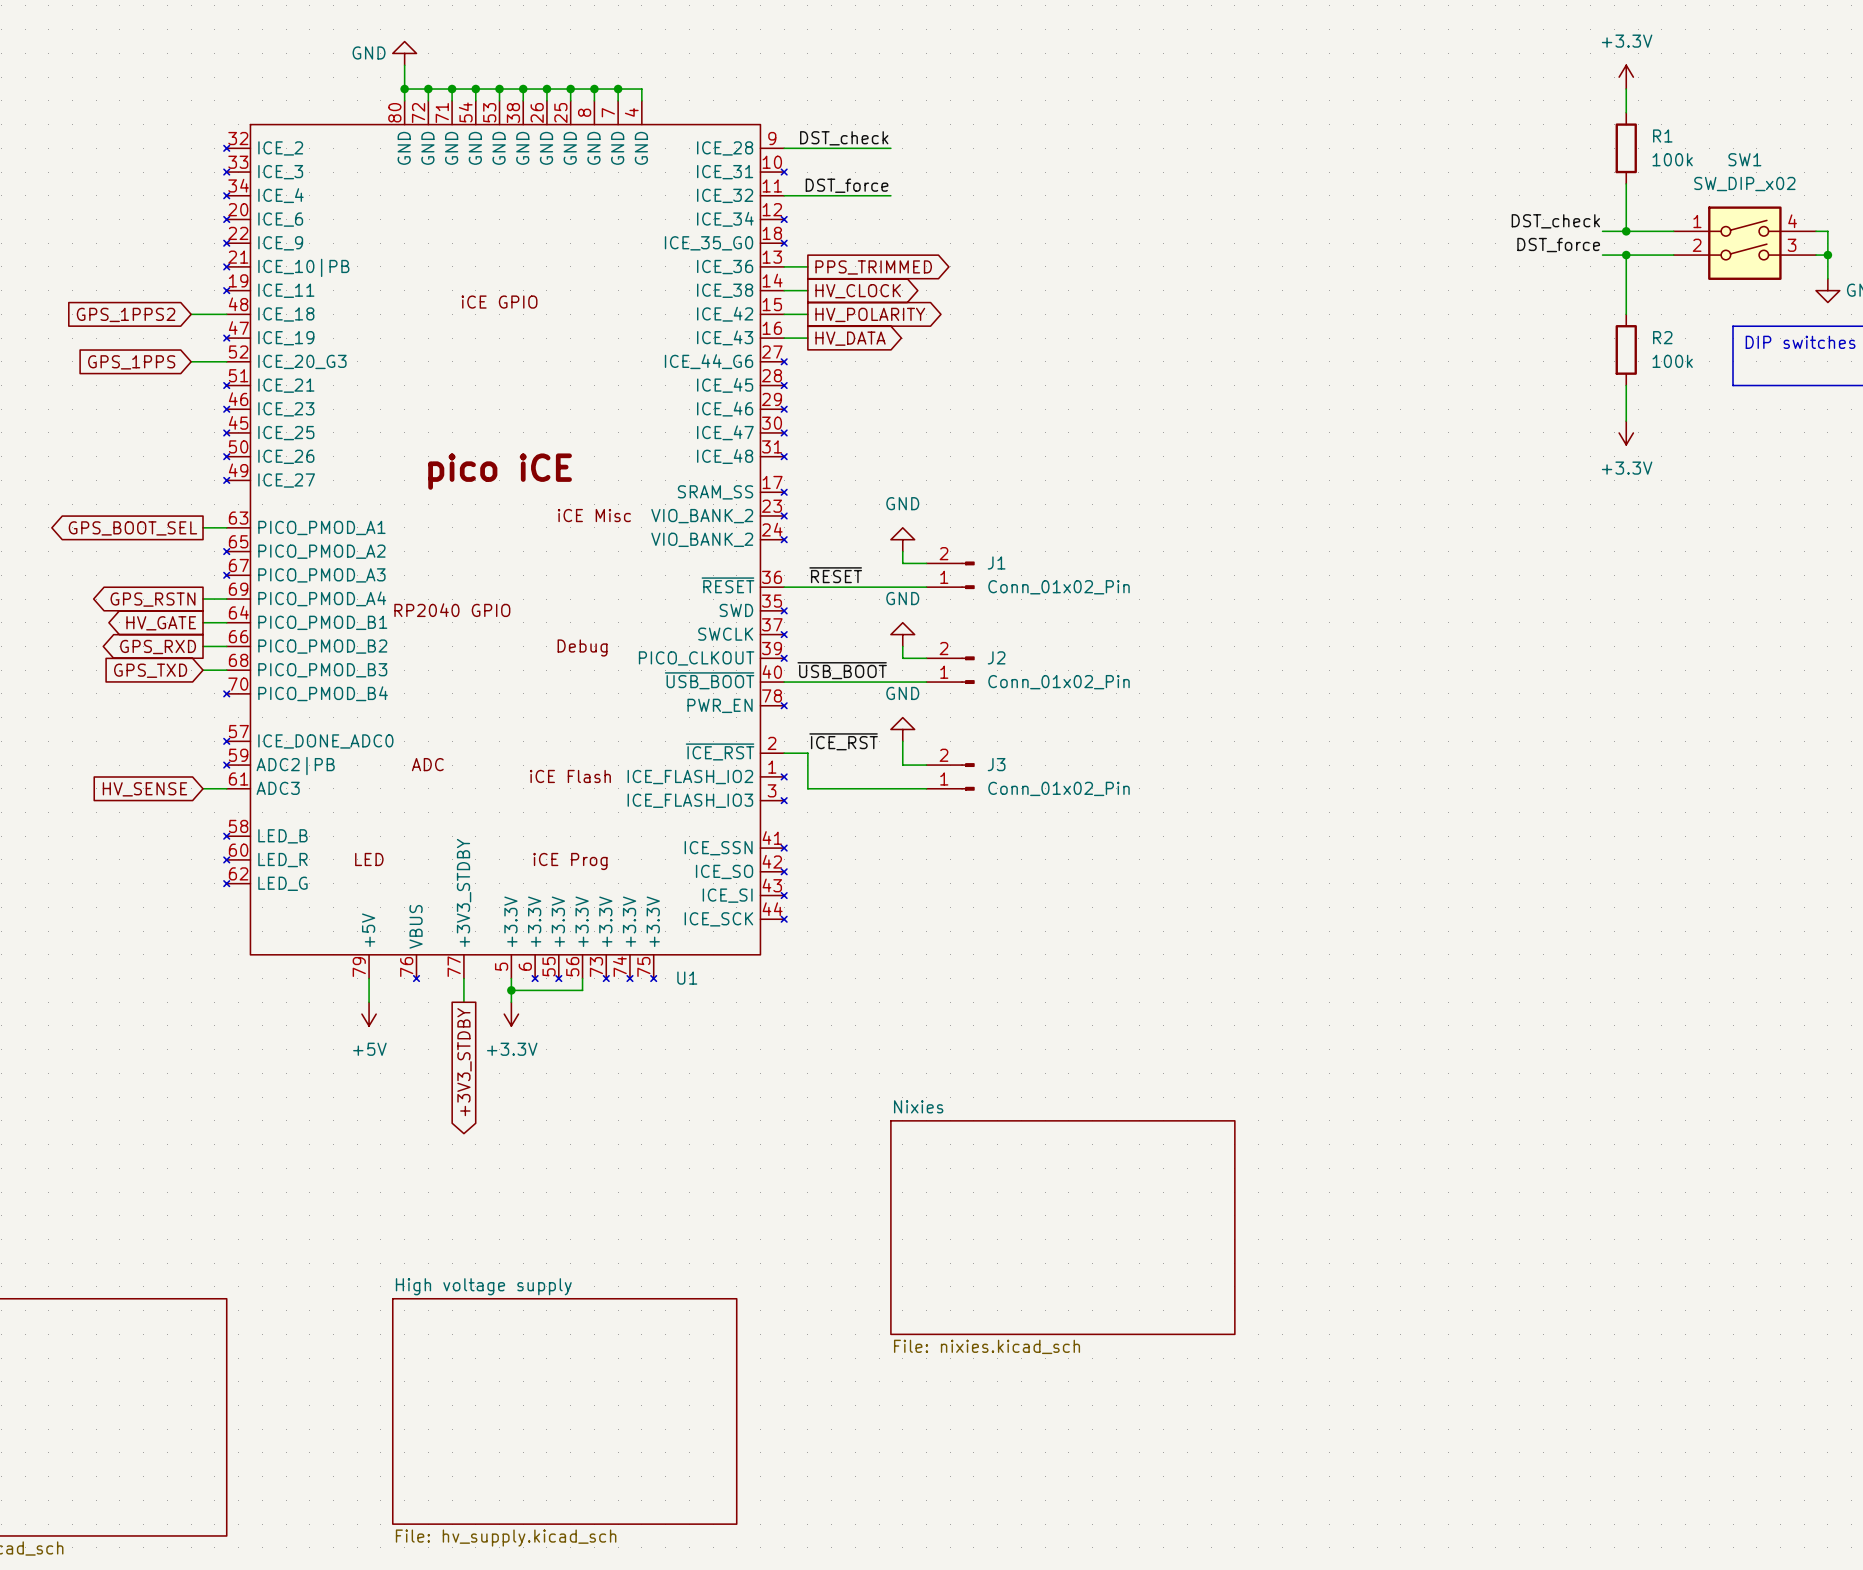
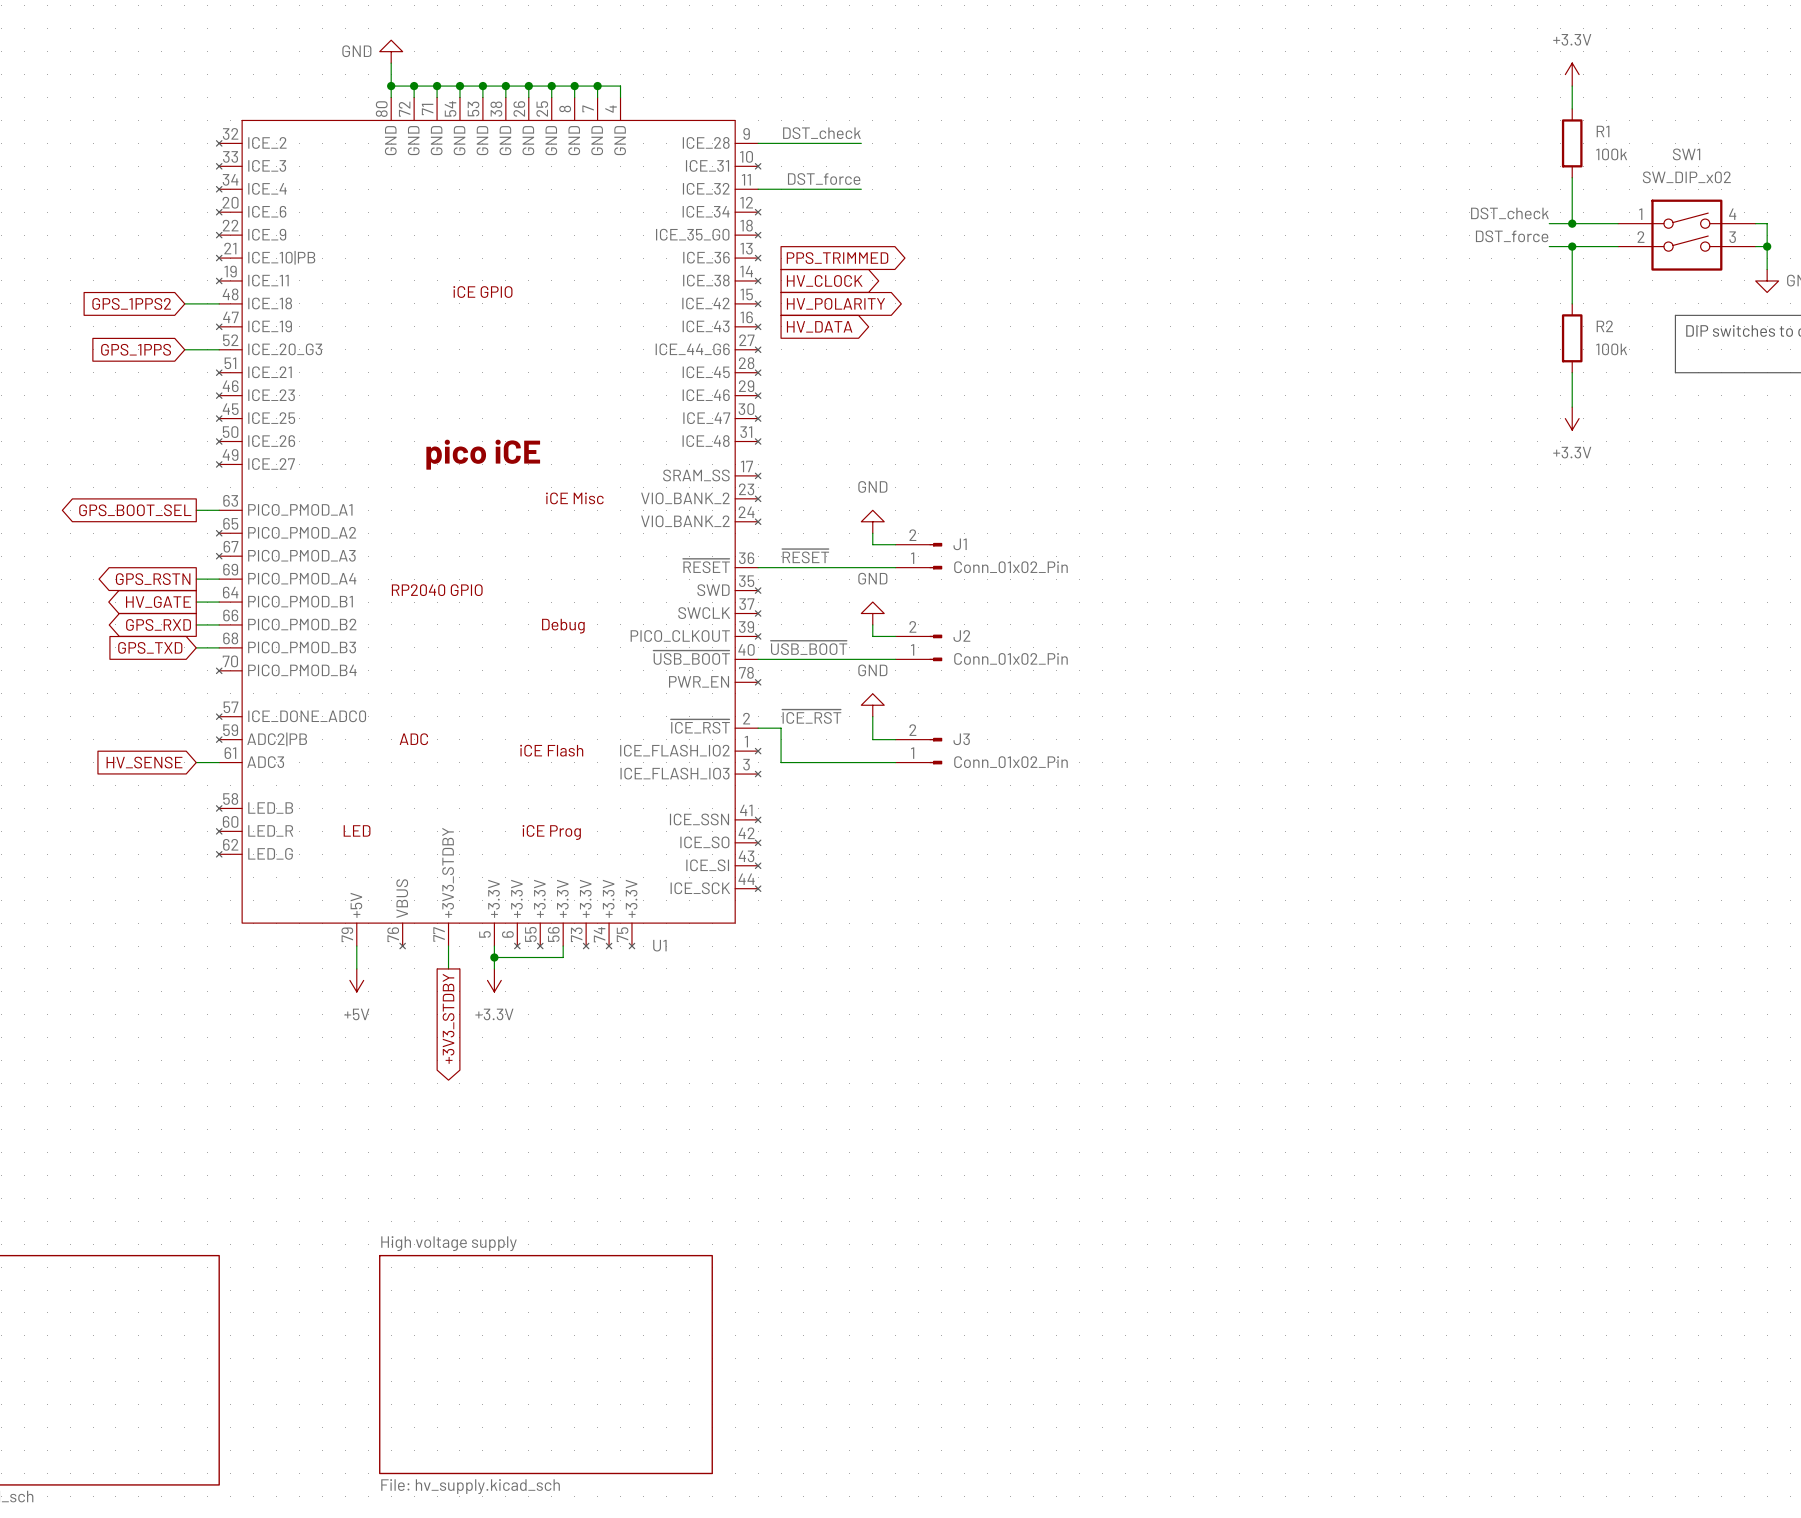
U1 symbol: [223, 100, 787, 982] -> [216, 97, 761, 949]
wire: (784, 266) (807, 266) -> none
wire: (784, 290) (807, 290) -> none
wire: (784, 314) (807, 314) -> none
wire: (784, 338) (807, 338) -> none
sheet Nixies: File: nixies.kicad_sch (1062, 1227) -> none

